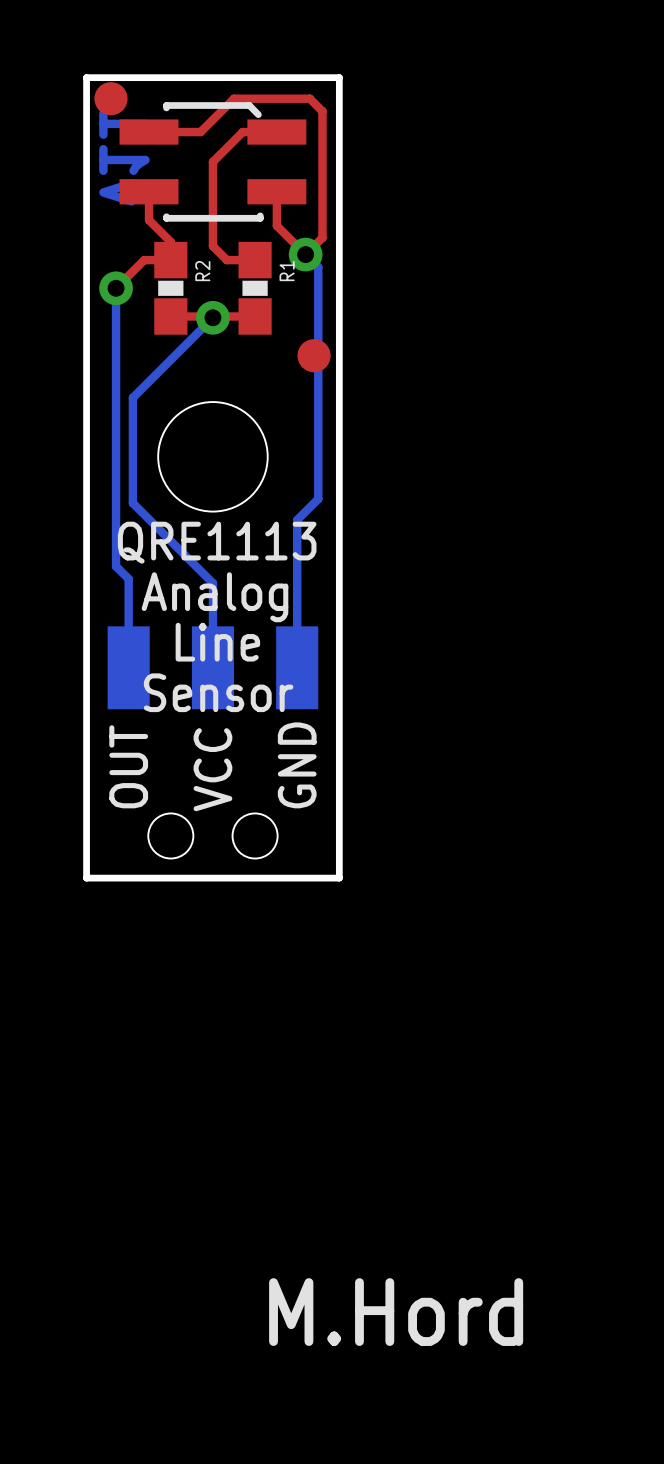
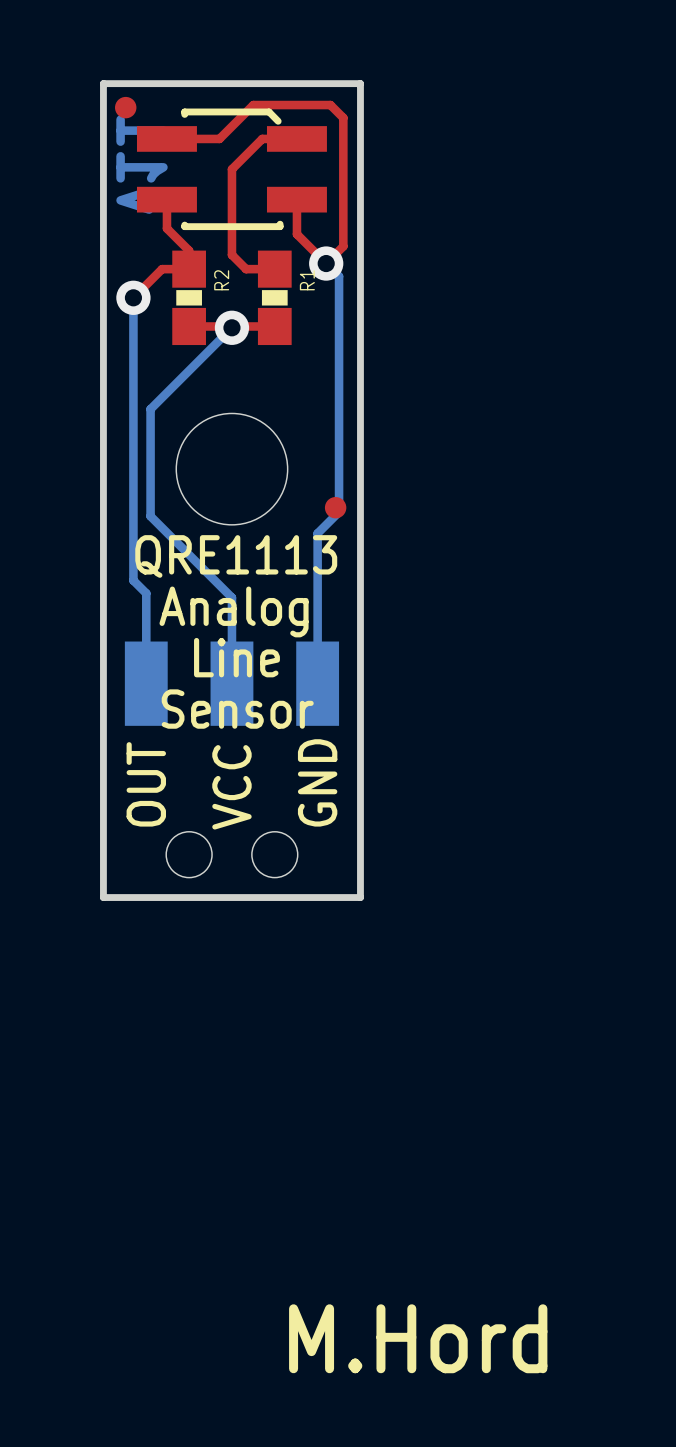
part footprint: [94, 82, 128, 116] -> [115, 96, 137, 119]
part: (314, 355) -> none
part: none -> (335, 507)

